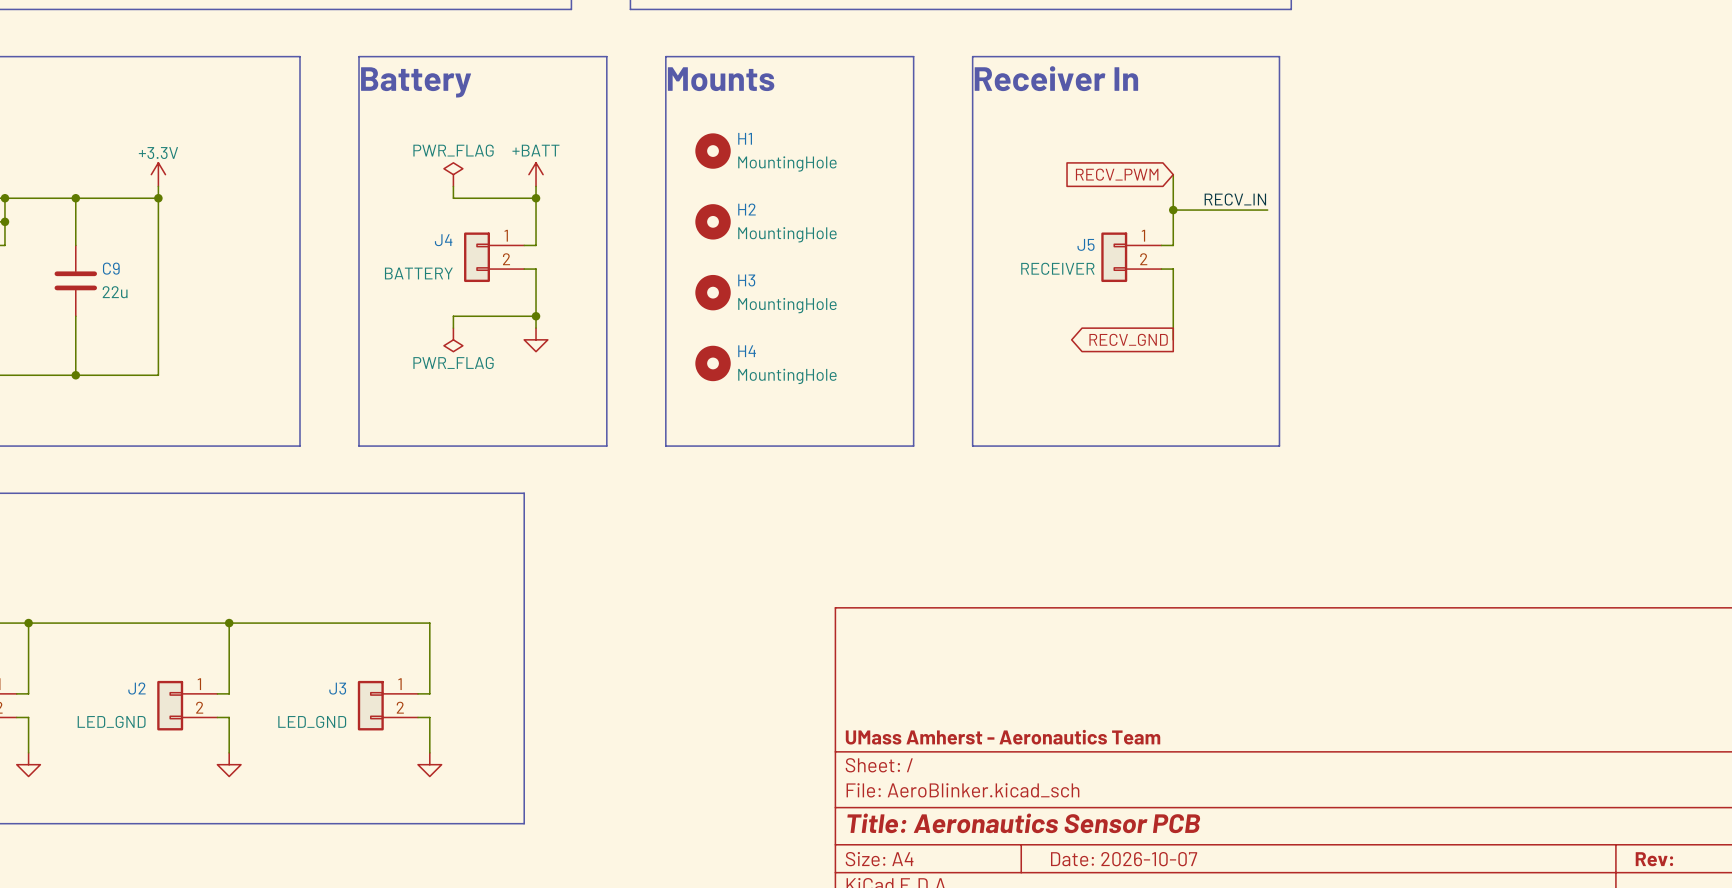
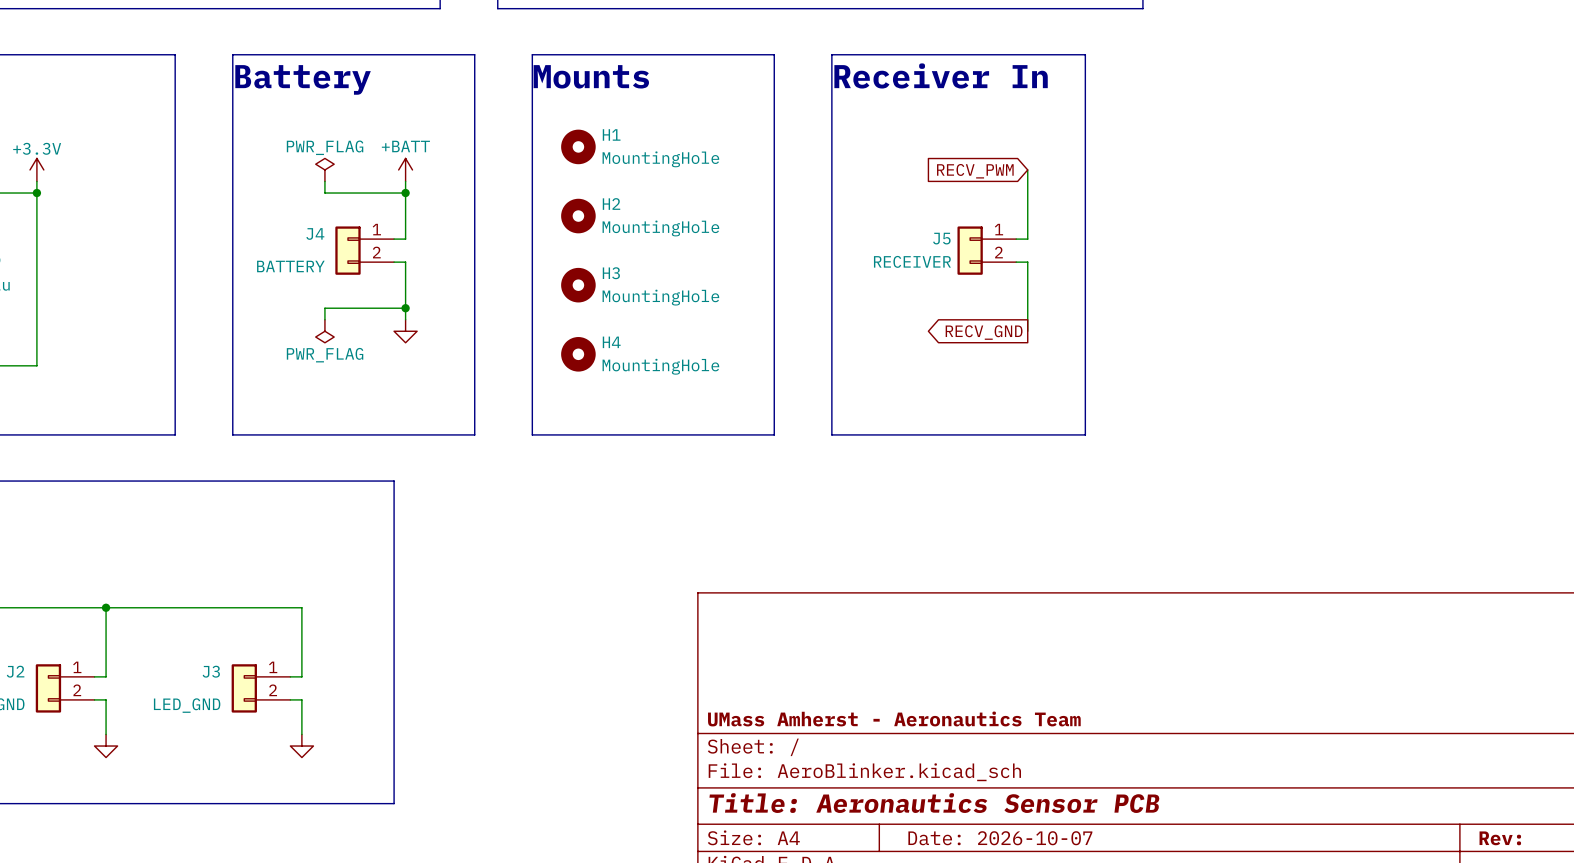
line: (1232, 56) (1279, 56) (1279, 446) (1232, 446) -> (1085, 54) (1085, 434)
label: RECV_IN (1235, 199) -> none
wire: (1173, 210) (1267, 210) -> none
junction: (1173, 210) -> none

